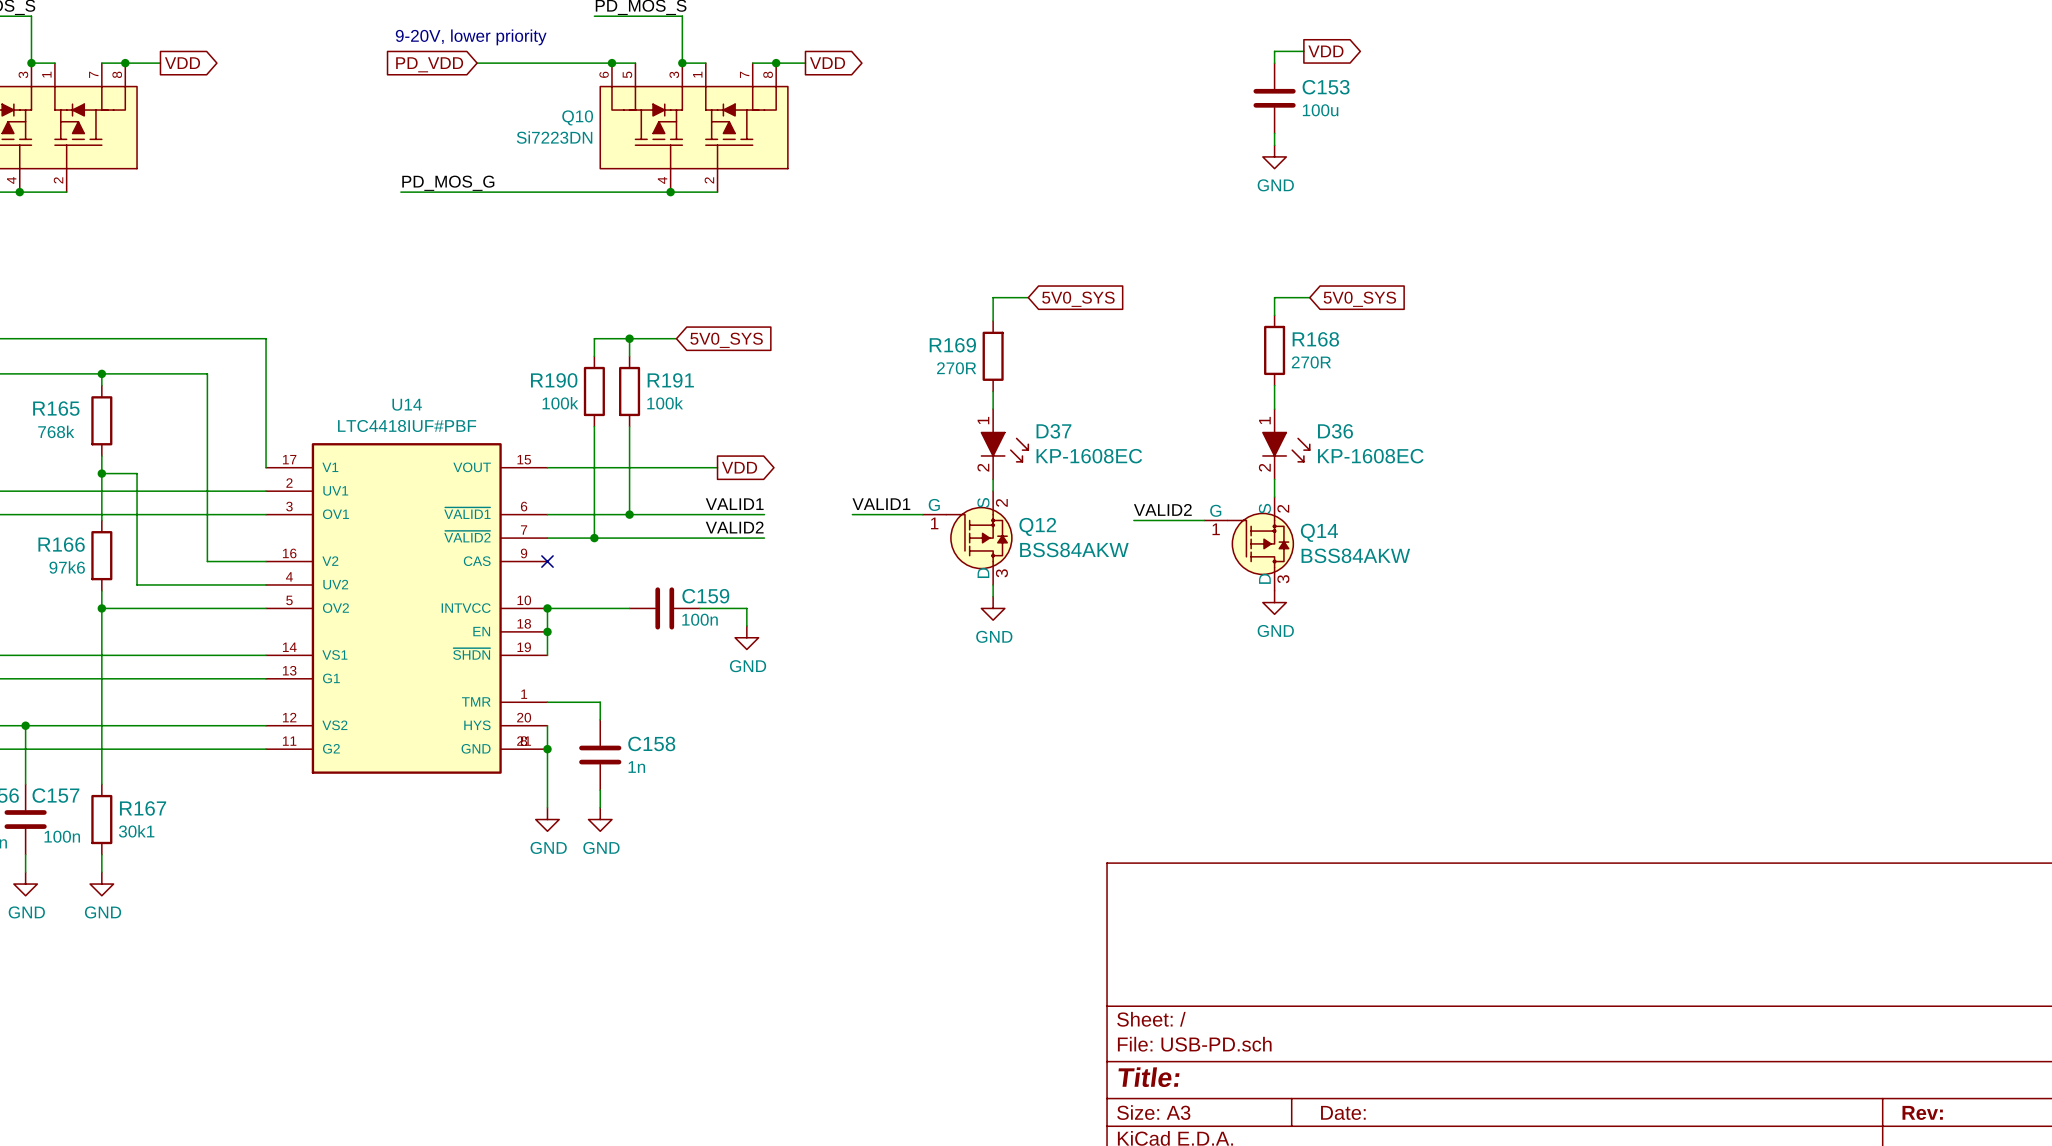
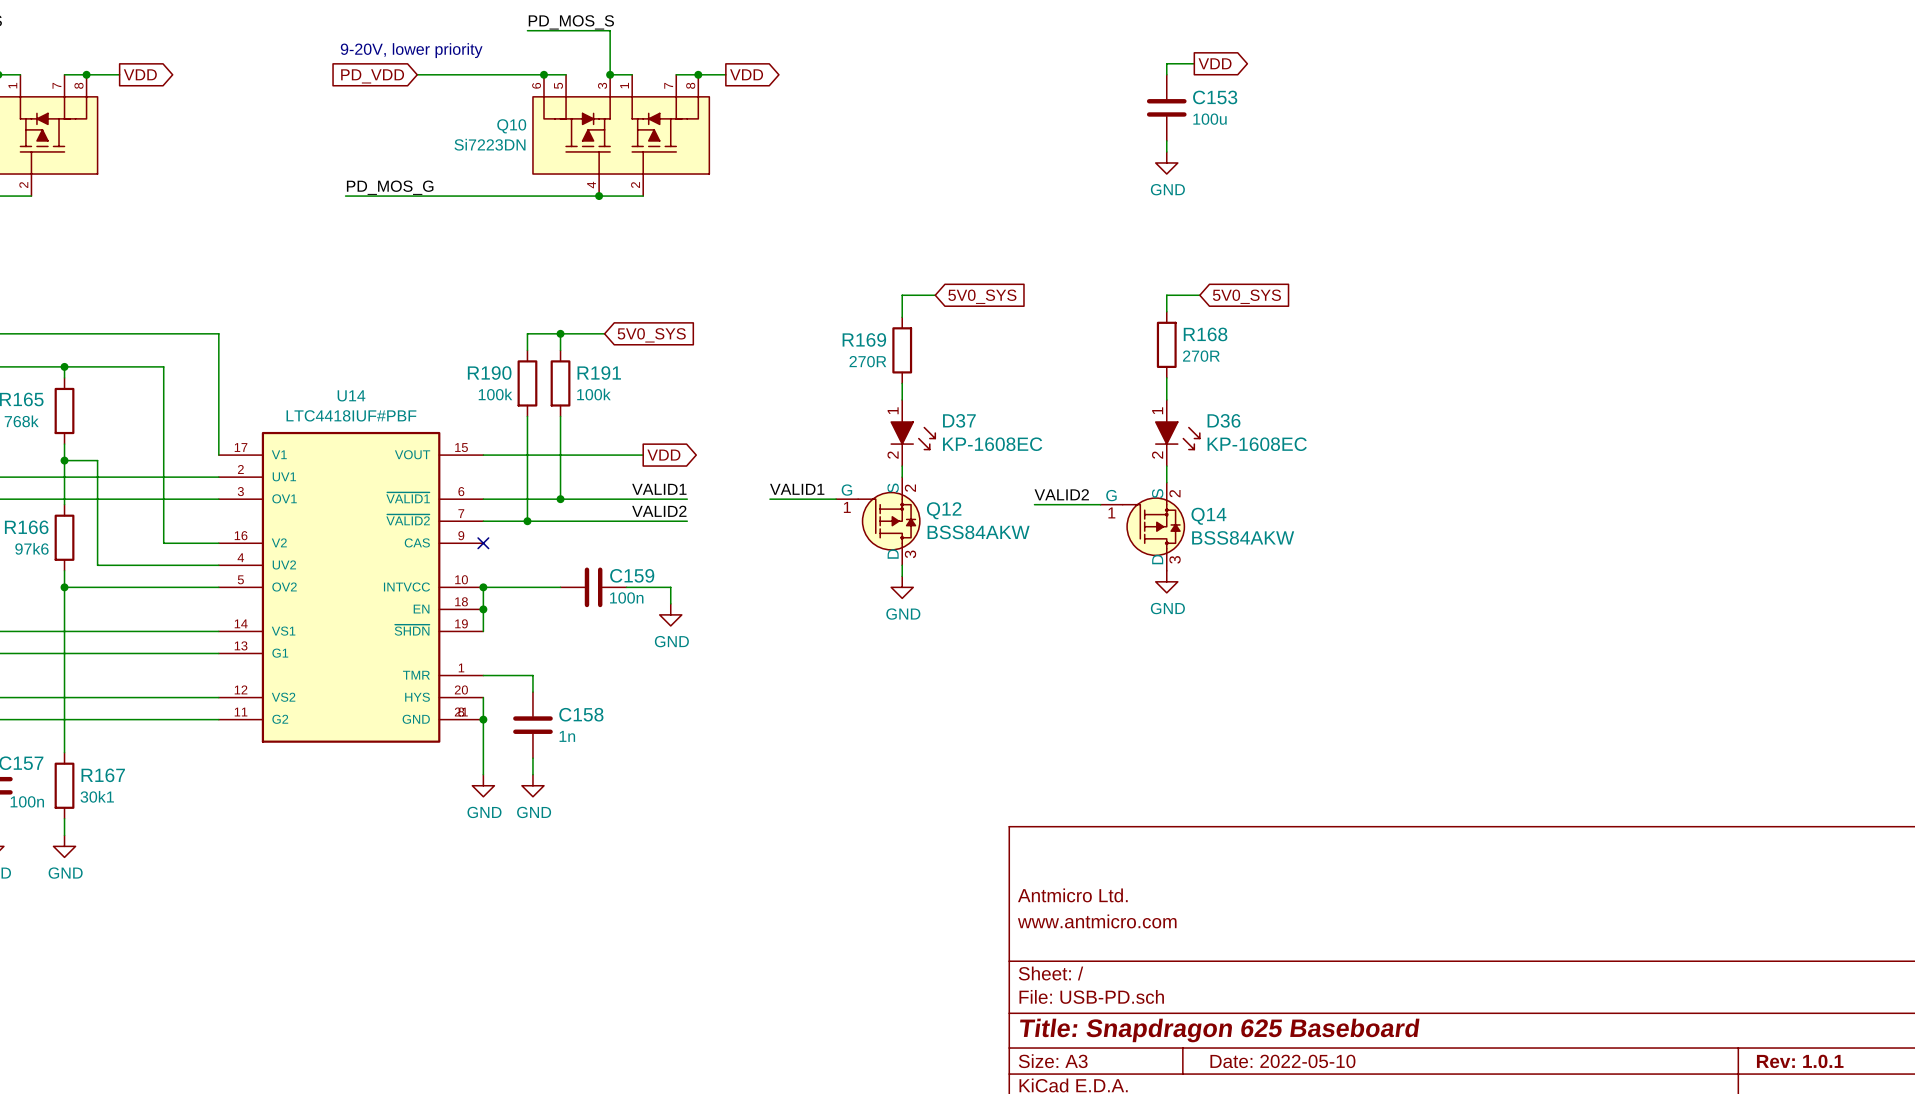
title block: none -> Antmicro Ltd. (1072, 895)
title block: none -> www.antmicro.com (1097, 921)
title block: Title: (1148, 1077) -> Title: Snapdragon 625 Baseboard (1219, 1030)
title block: Date: (1343, 1112) -> Date: 2022-05-10 (1282, 1061)
title block: Rev: (1922, 1112) -> Rev: 1.0.1 (1800, 1061)

